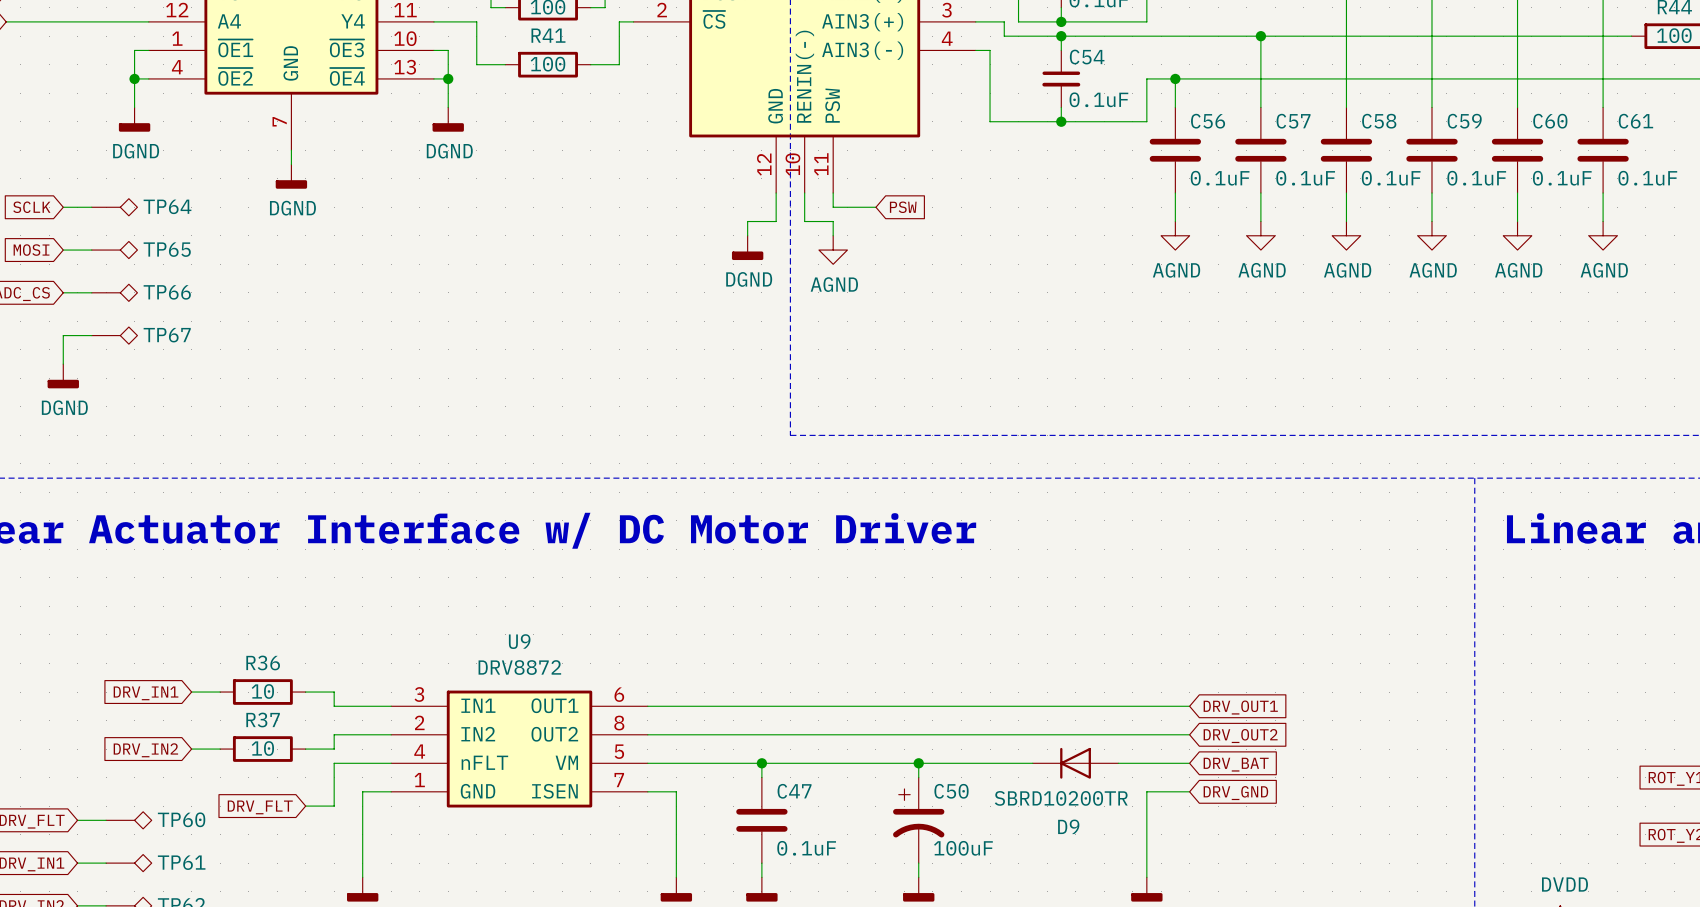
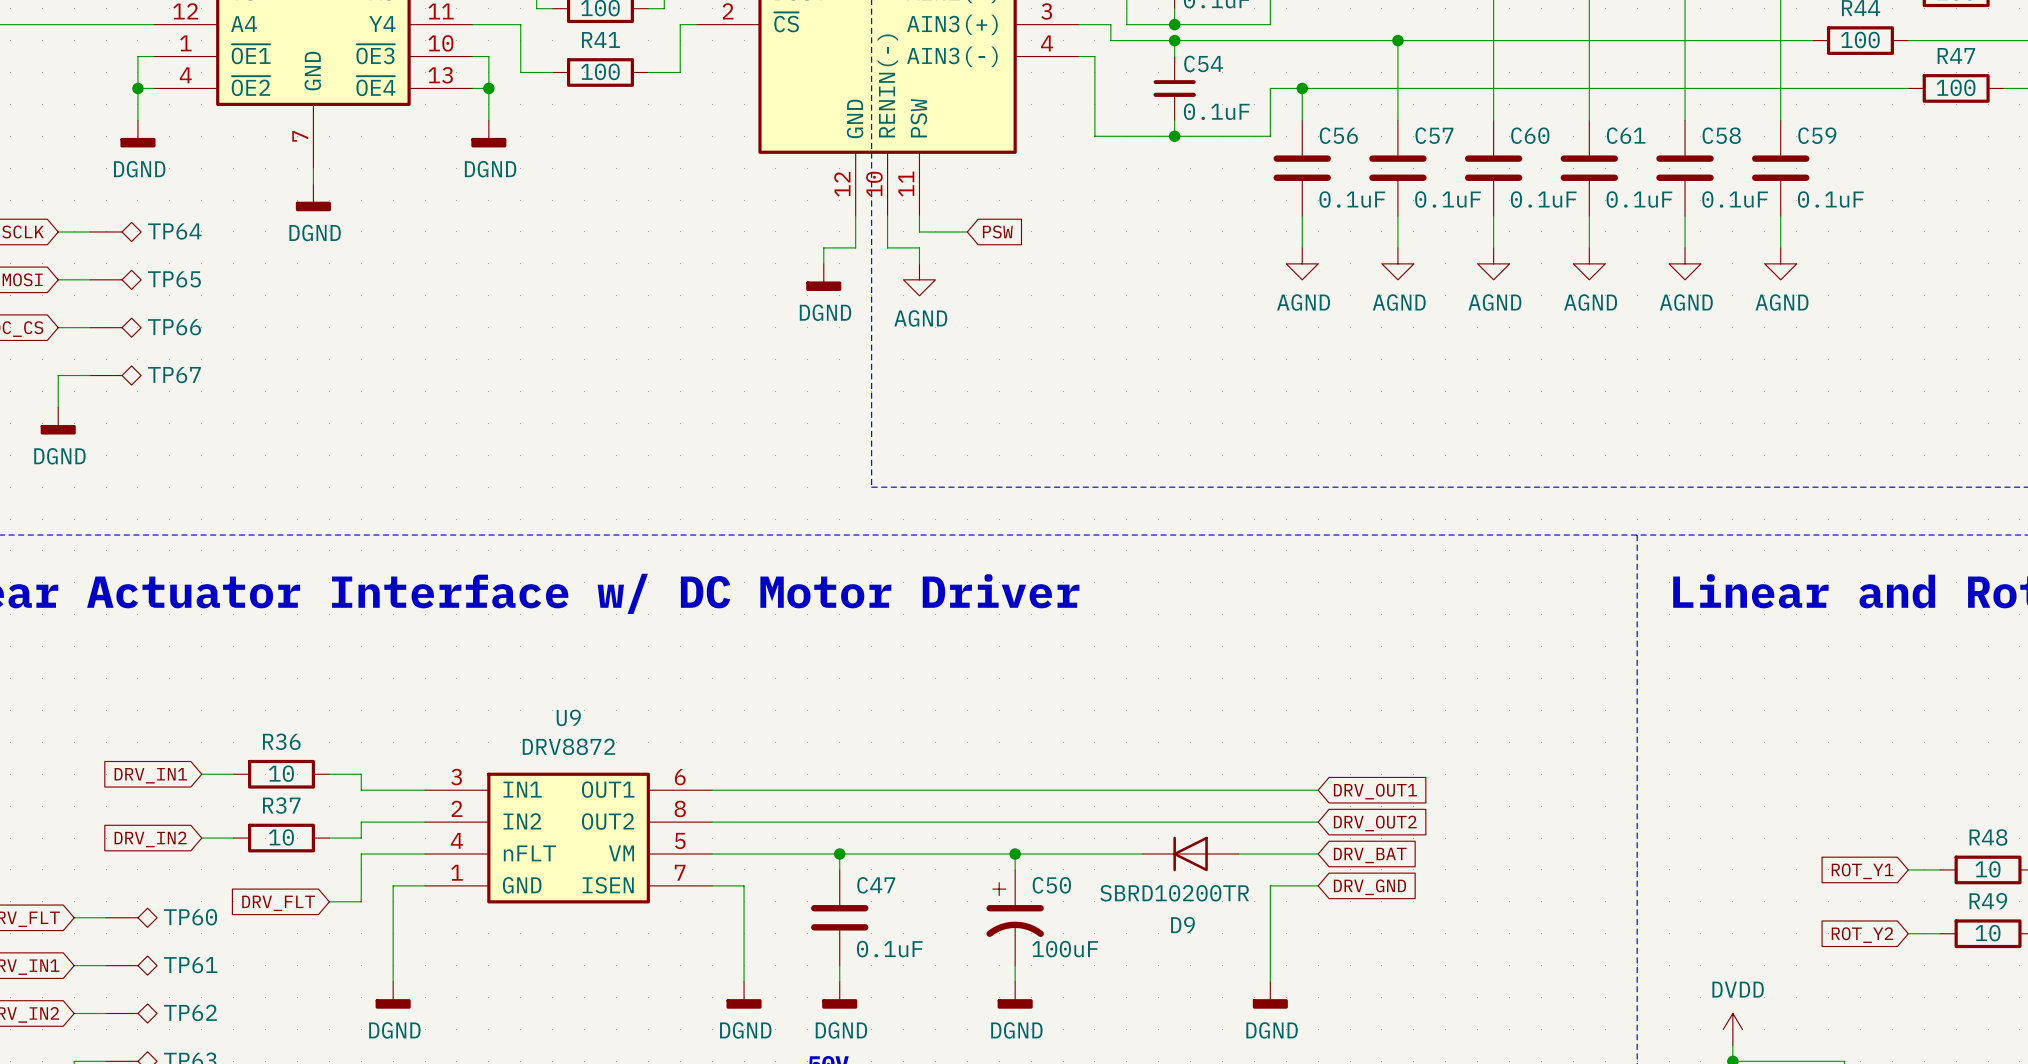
C58 name: C58 (1379, 121) -> C60 (1530, 135)
C59 name: C59 (1464, 121) -> C61 (1626, 135)
C60 name: C60 (1550, 121) -> C58 (1721, 135)
C61 name: C61 (1635, 121) -> C59 (1817, 135)

